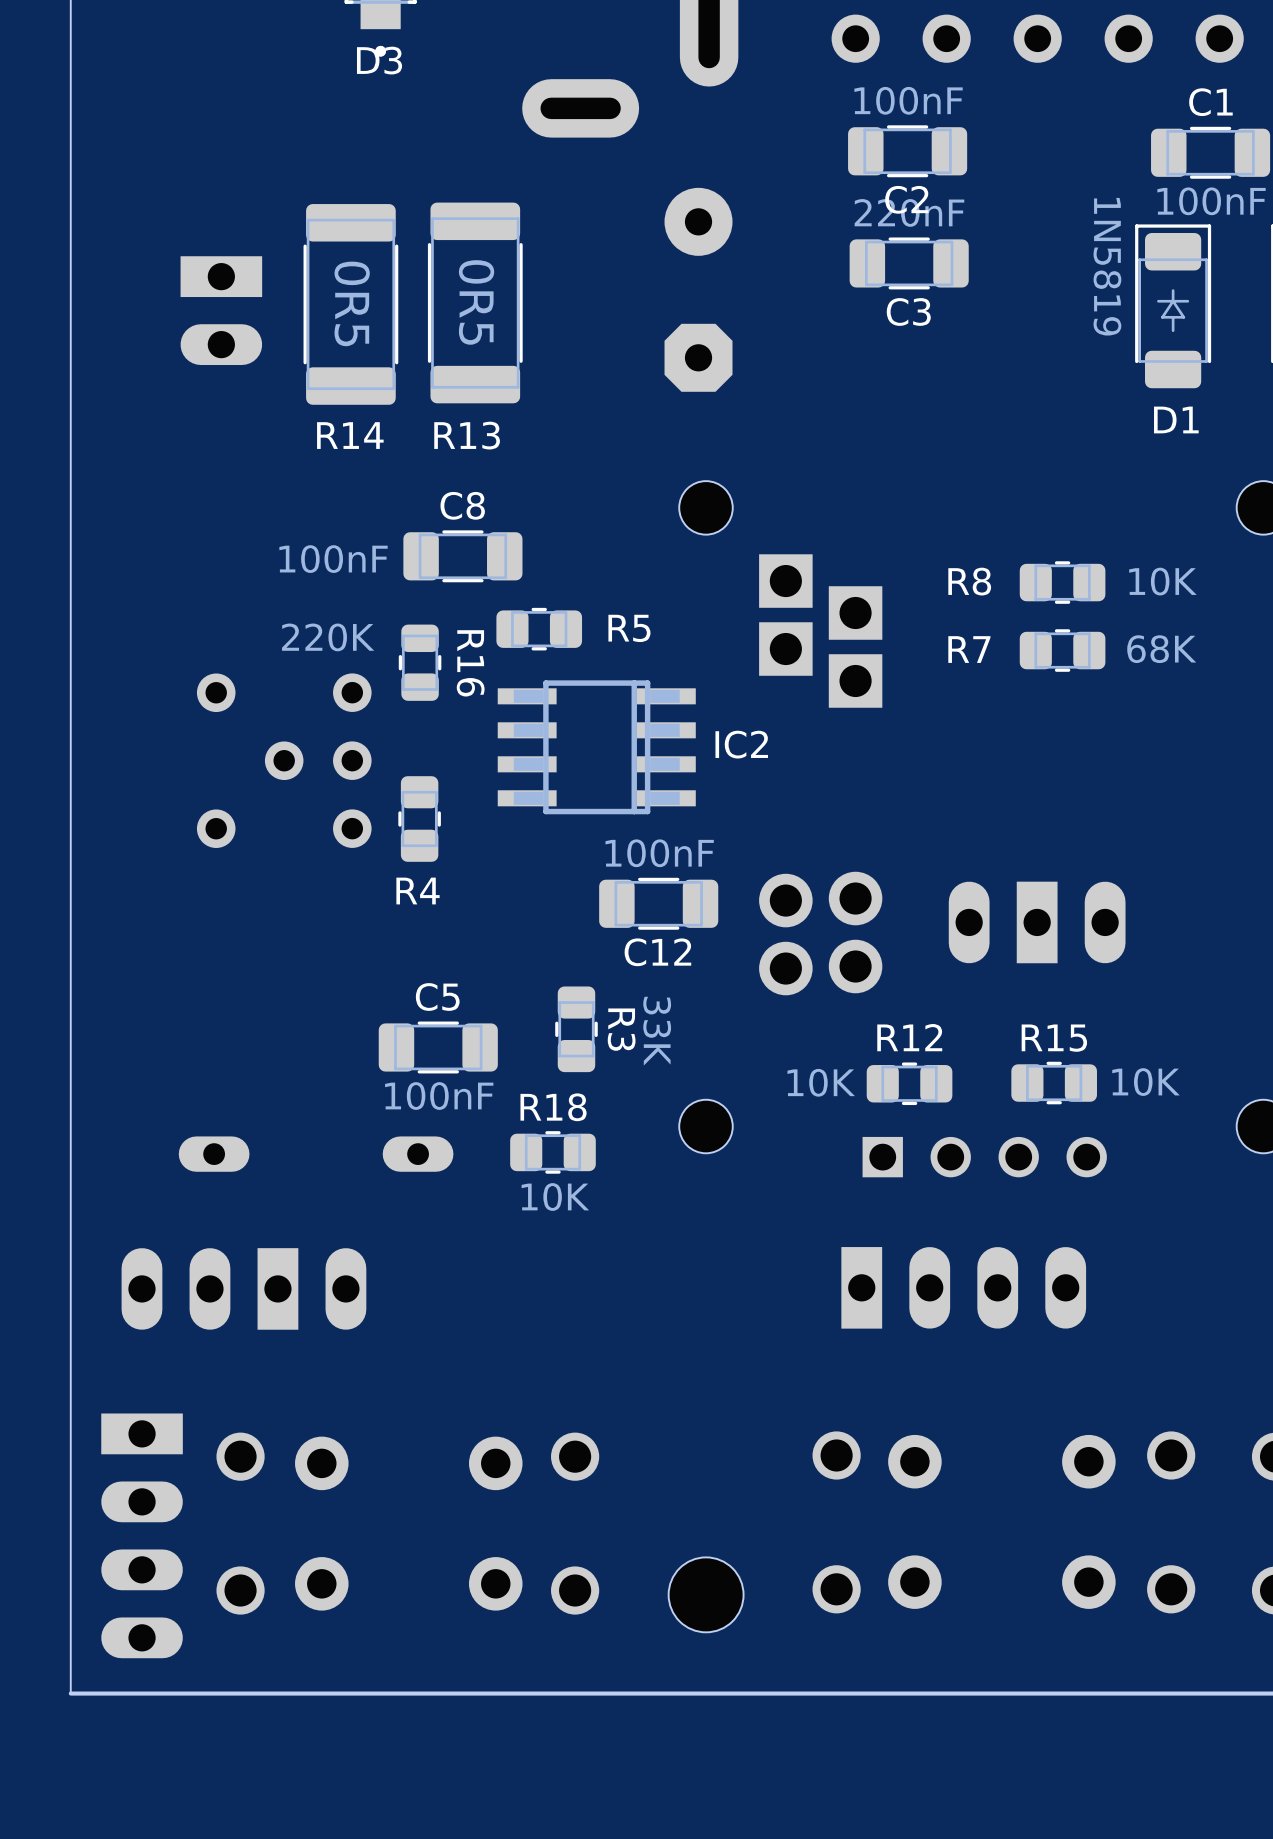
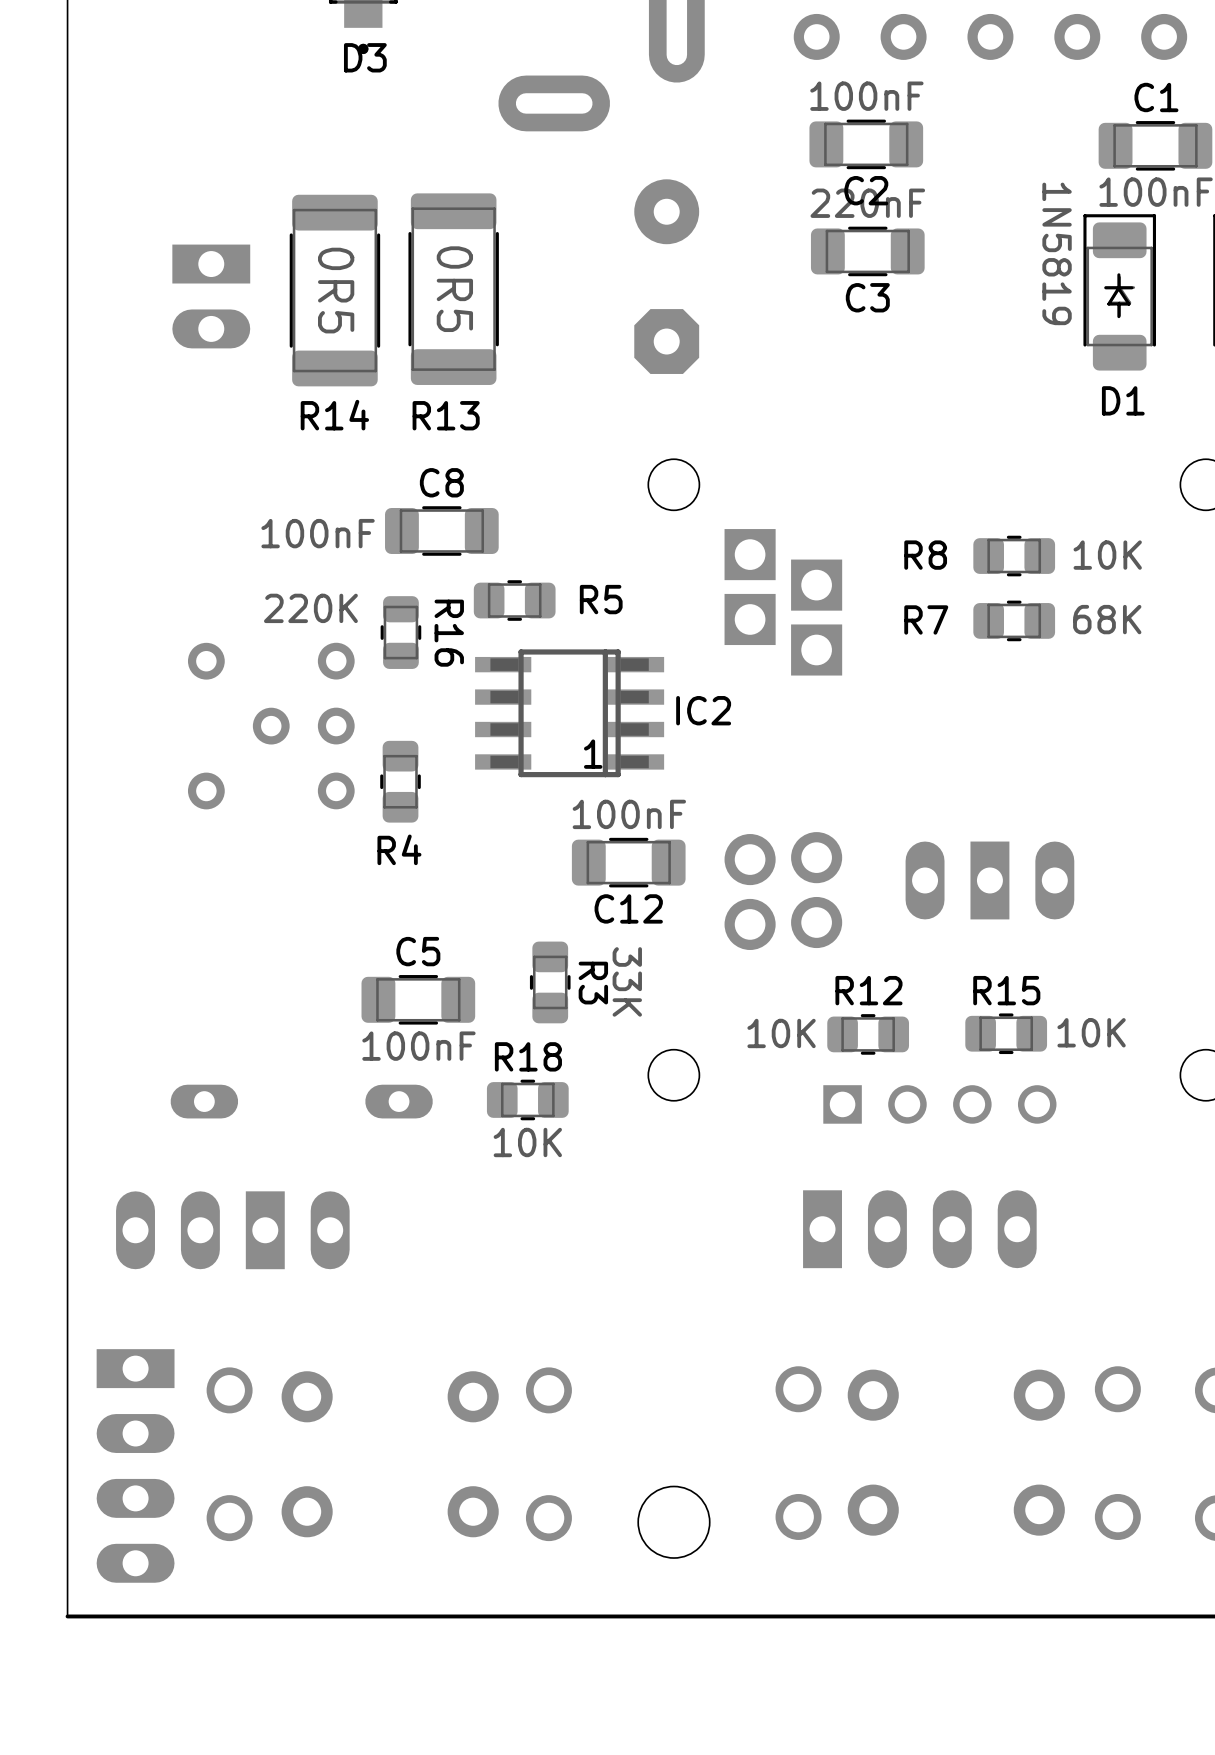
line: none -> (1118, 274) (1118, 287) (1108, 303)
line: none -> (1131, 287) (1105, 287)
line: none -> (1118, 288) (1128, 304) (1118, 304) (1118, 316)
line: none -> (1118, 303) (1108, 304)
text: none -> 1 (593, 754)

